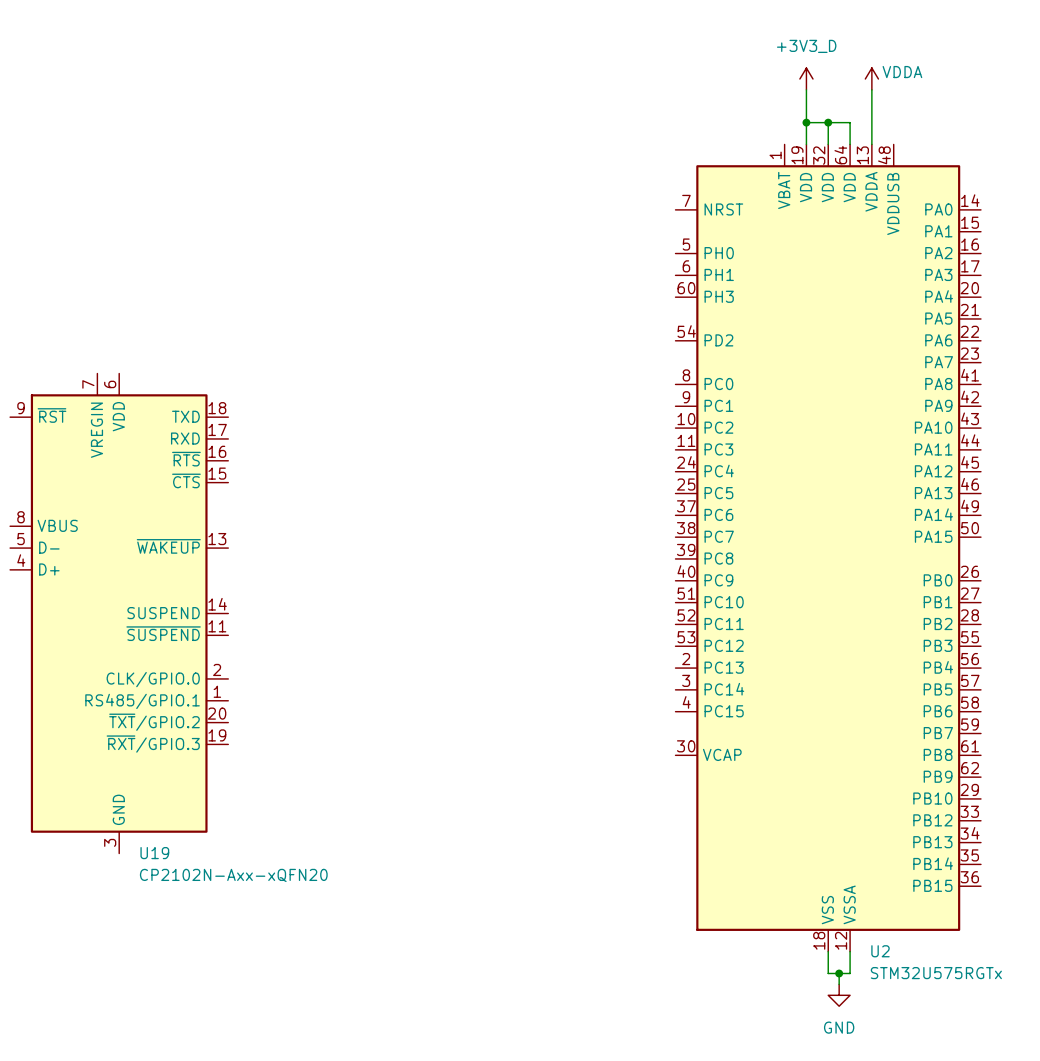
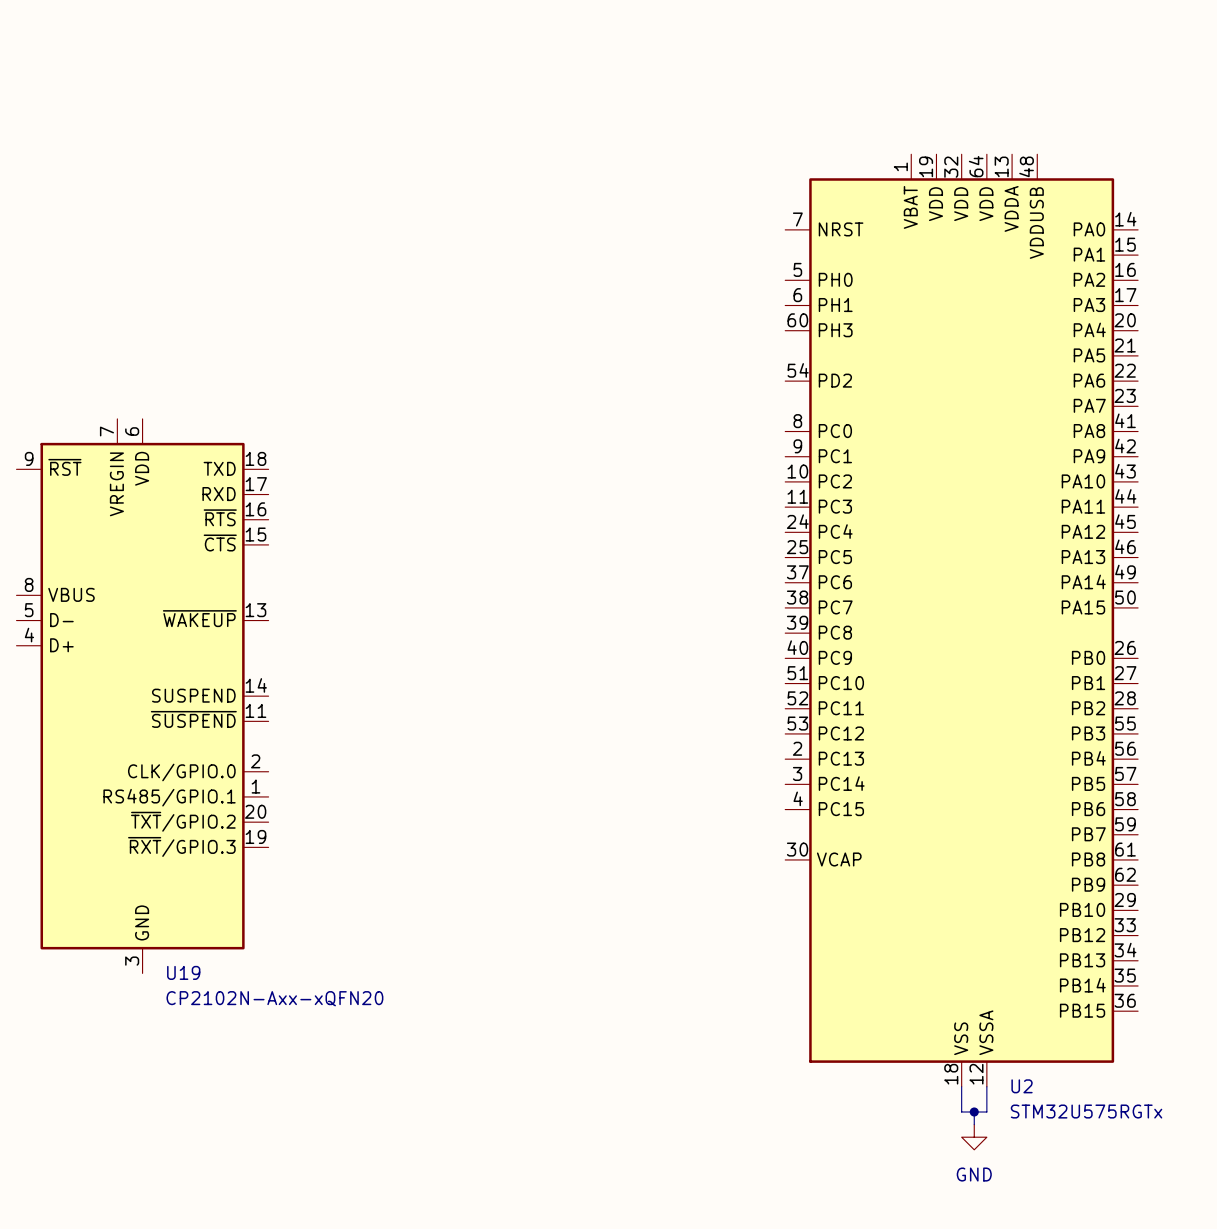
power symbol: +3V3_D (806, 79) -> none
power symbol: VDDA (871, 79) -> none
wire: (806, 89) (806, 144) -> none
wire: (871, 89) (871, 144) -> none
wire: (806, 122) (850, 122) (850, 144) -> none
junction: (806, 122) -> none
wire: (828, 122) (828, 144) -> none
junction: (828, 122) -> none

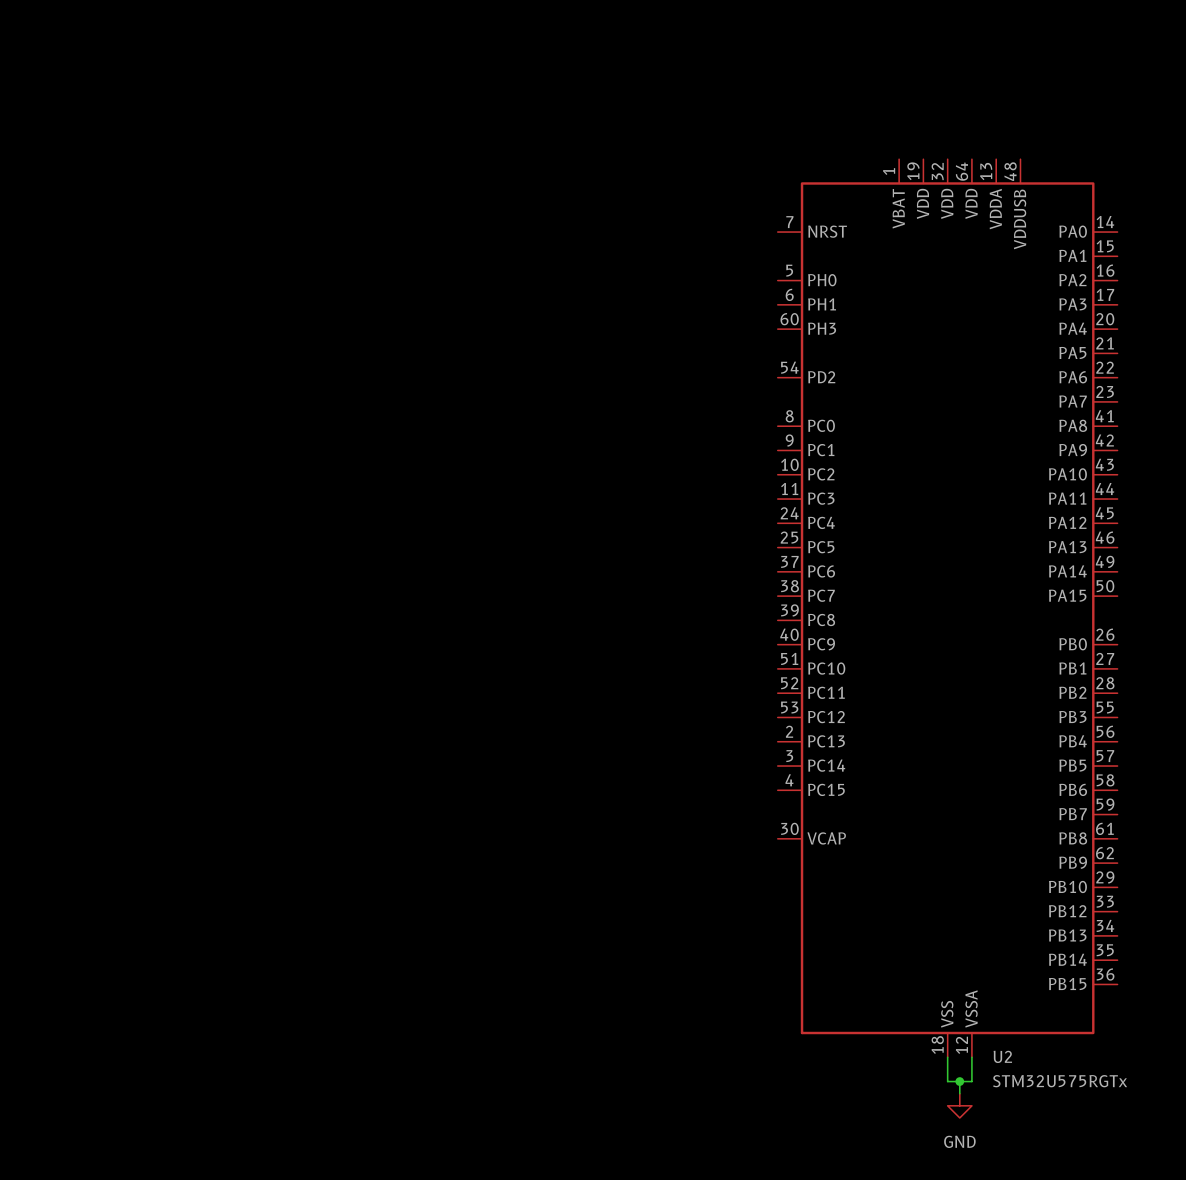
U19: CP2102N-Axx-xQFN20 (142, 696) -> none

